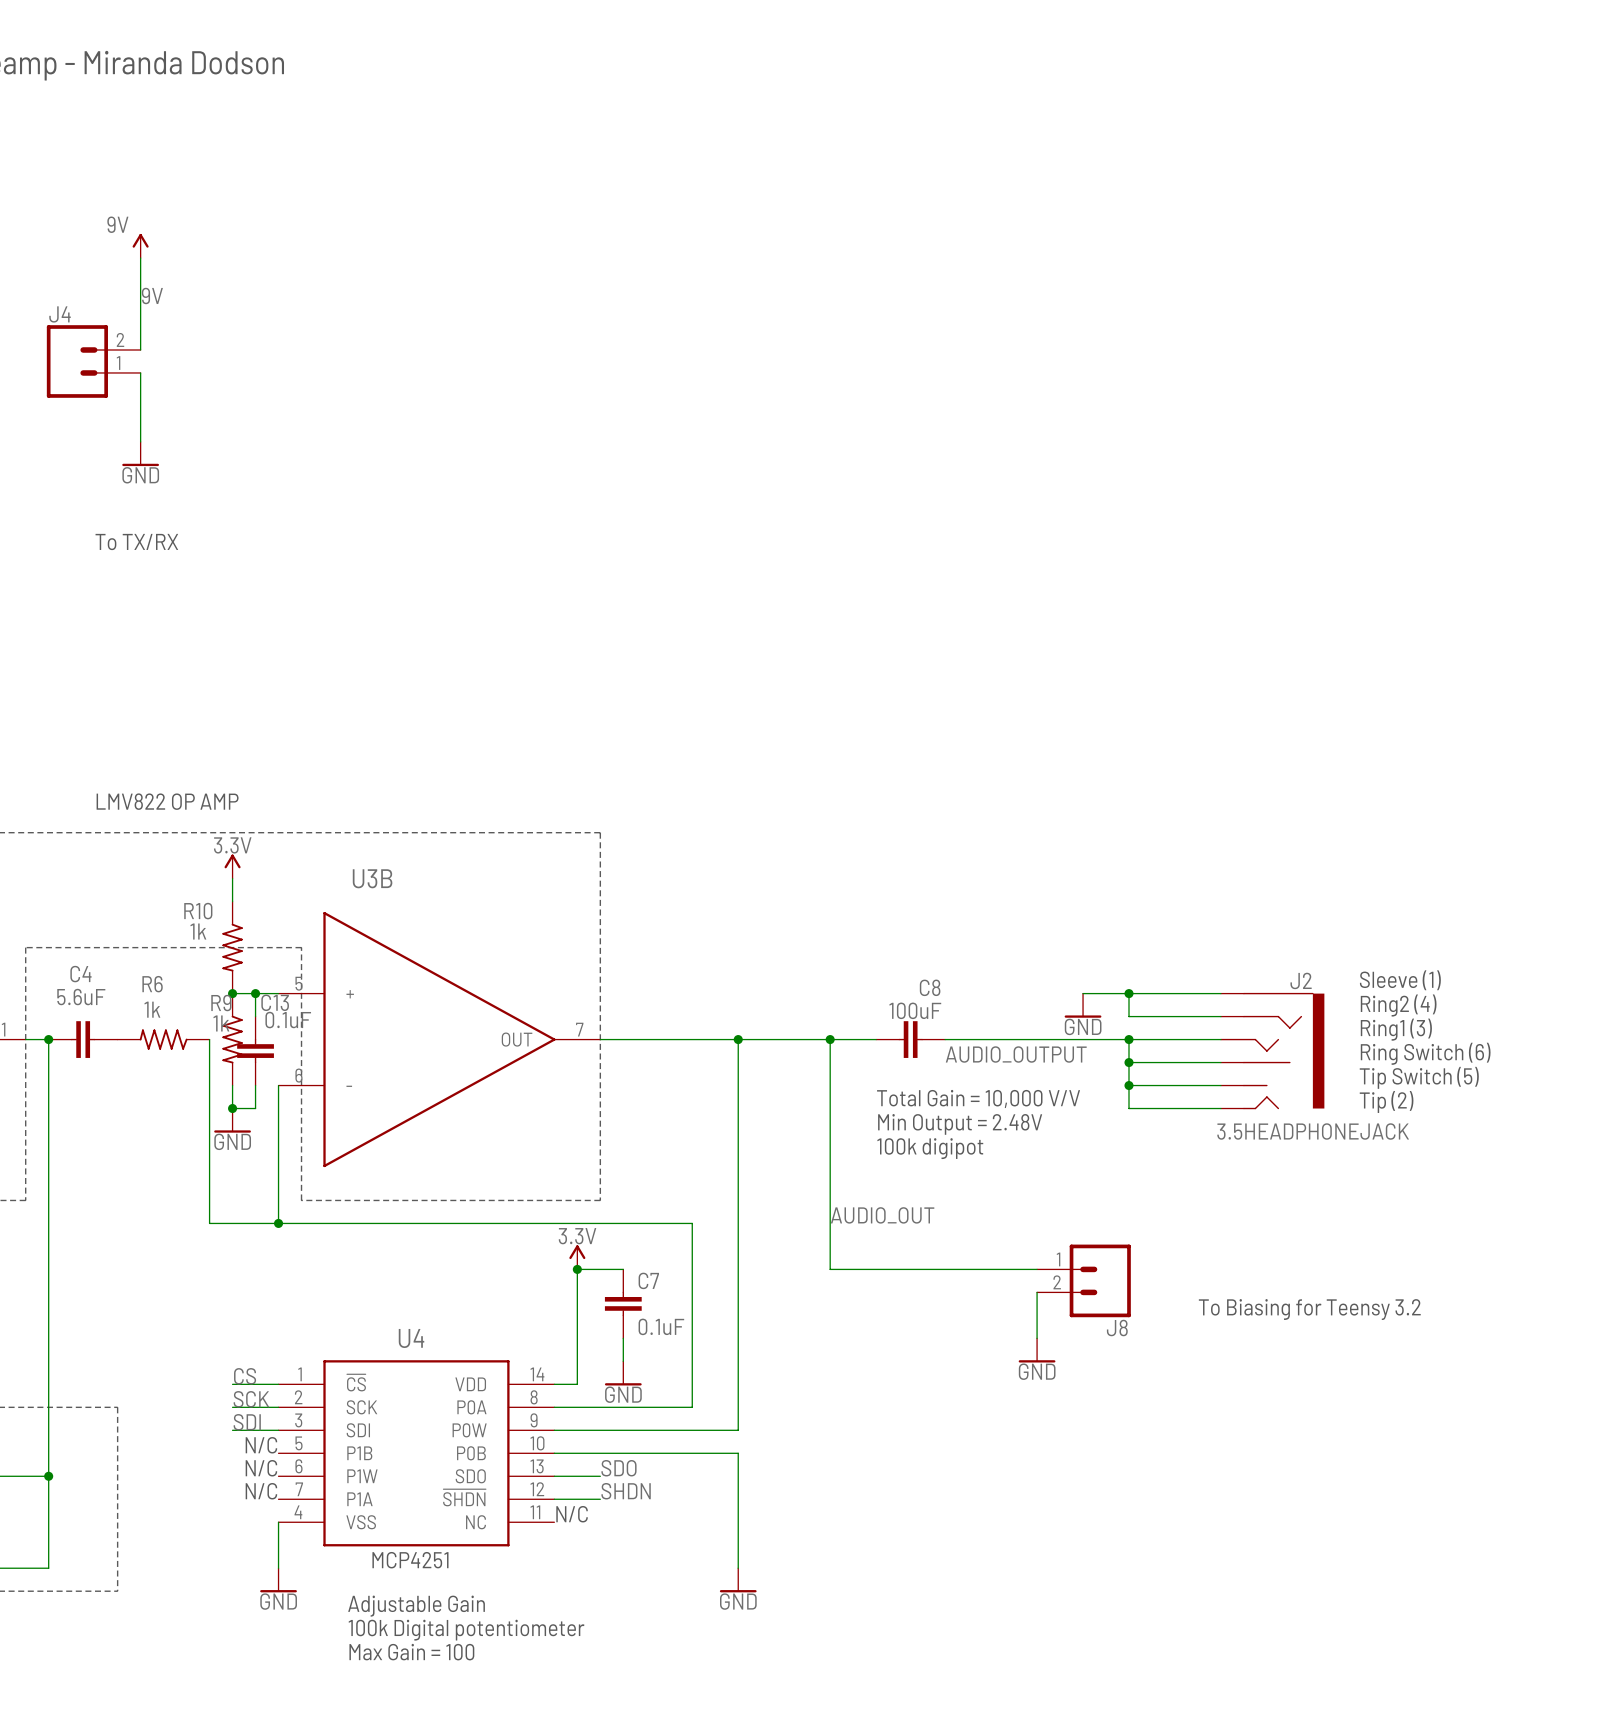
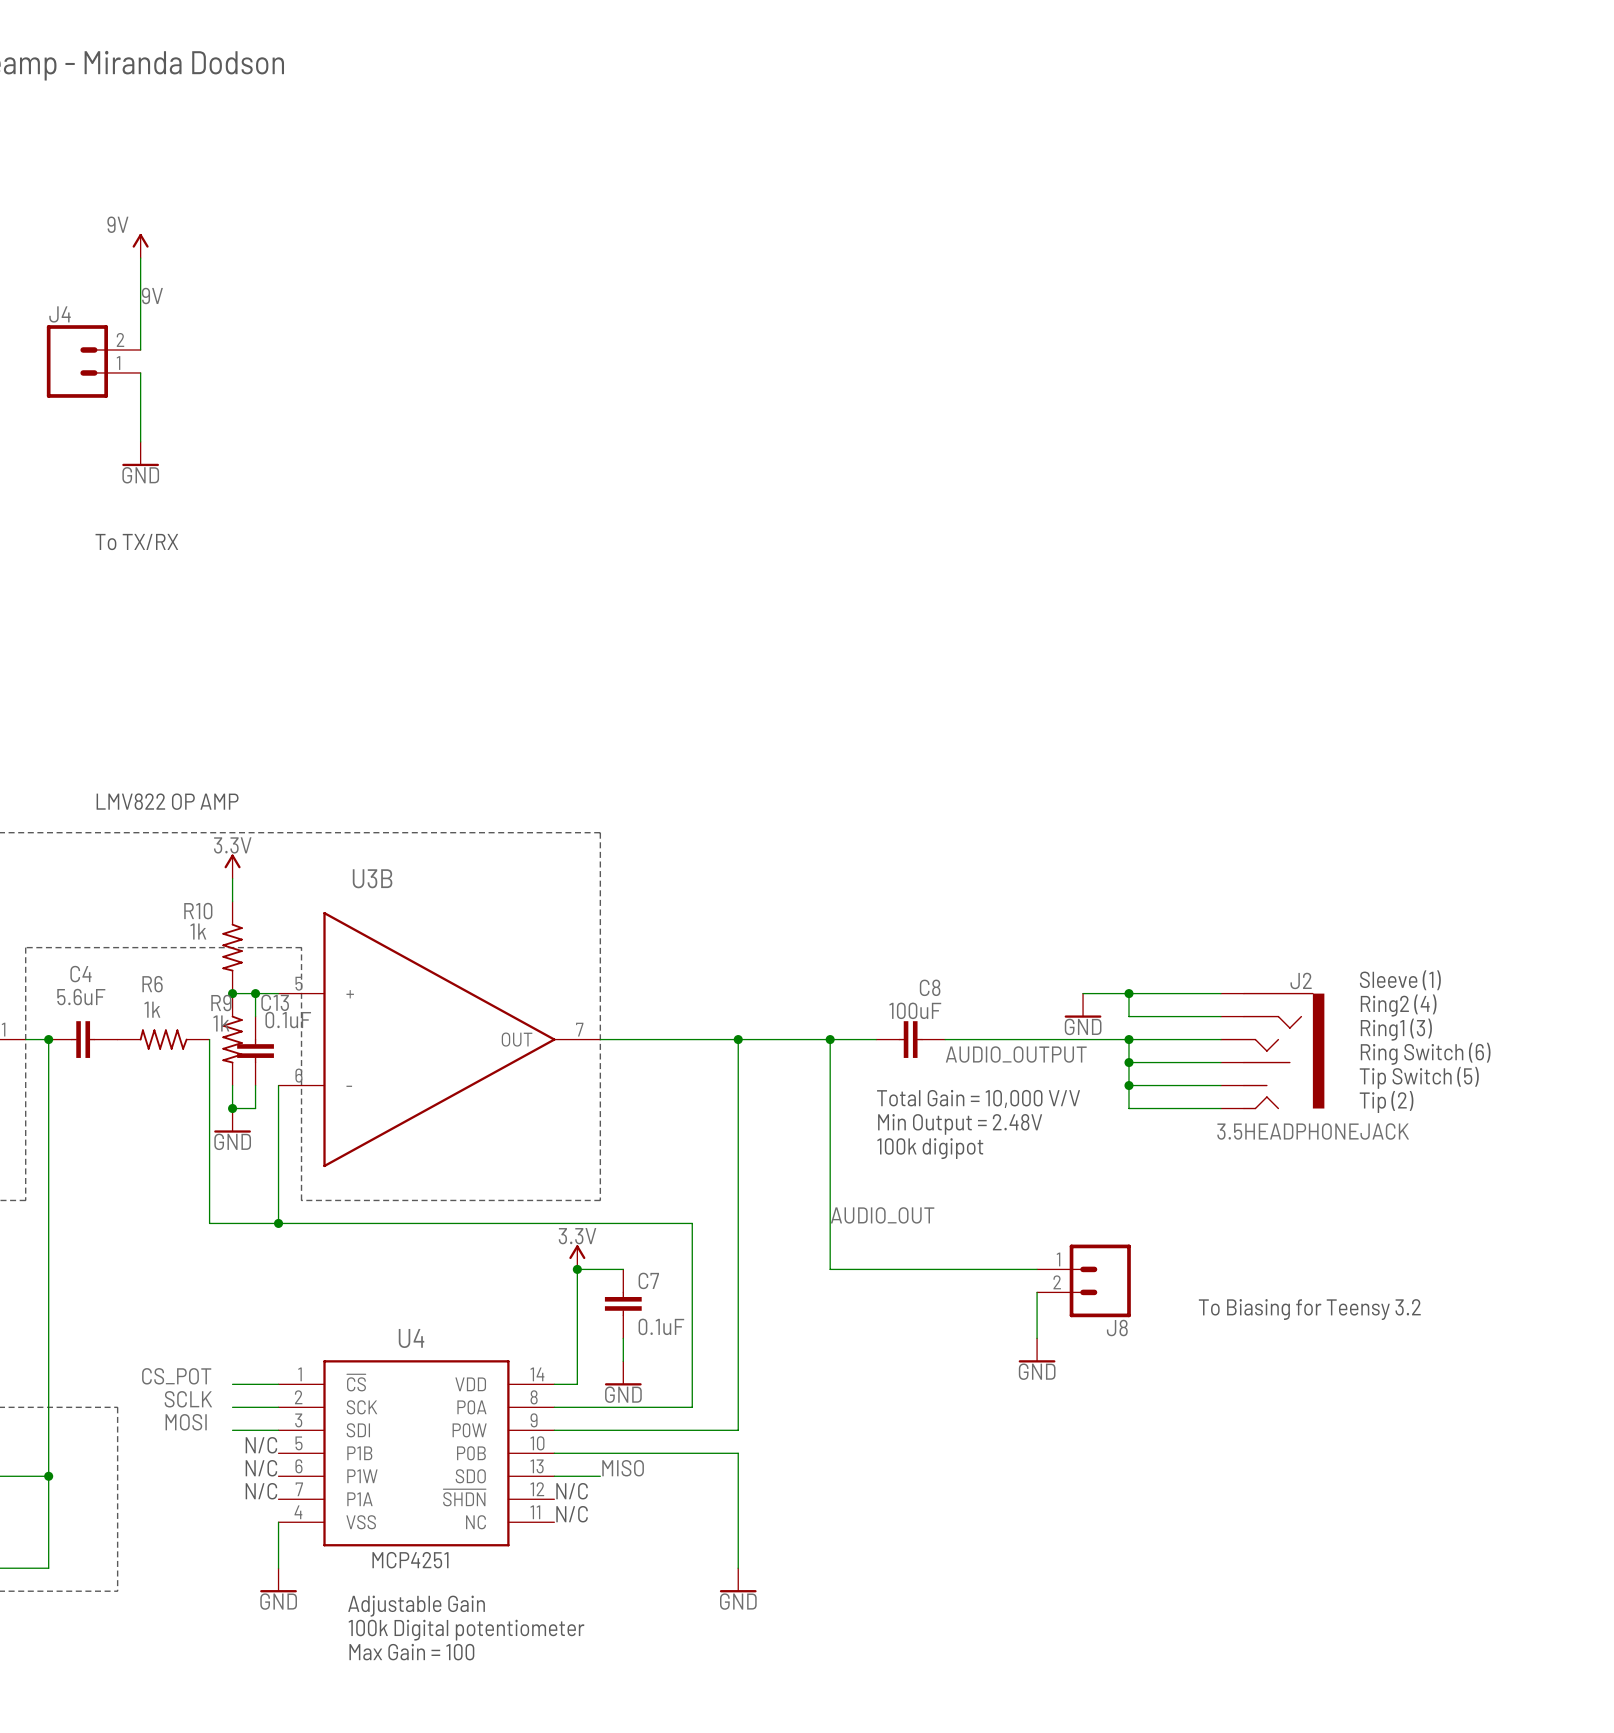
label: none -> CS_POT (176, 1376)
label: CS (245, 1376) -> none
label: none -> SCLK (188, 1399)
label: SCK (251, 1399) -> none
label: none -> MOSI (186, 1422)
label: SDI (247, 1422) -> none
label: SDO (618, 1468) -> MISO (623, 1468)
text: none -> N/C (572, 1491)
label: SHDN (626, 1491) -> none
wire: (554, 1499) (600, 1499) -> none

